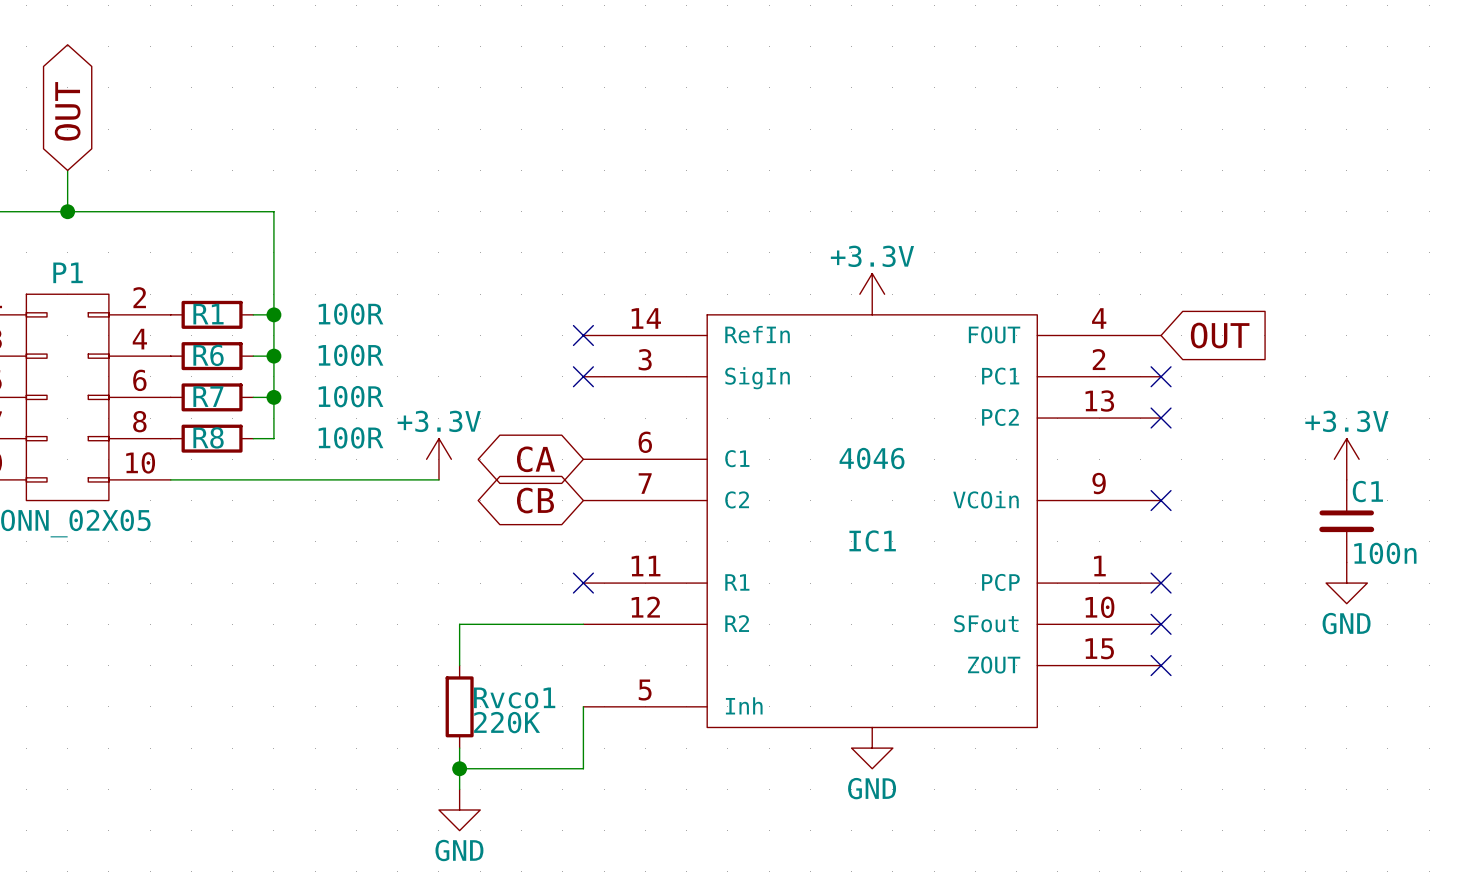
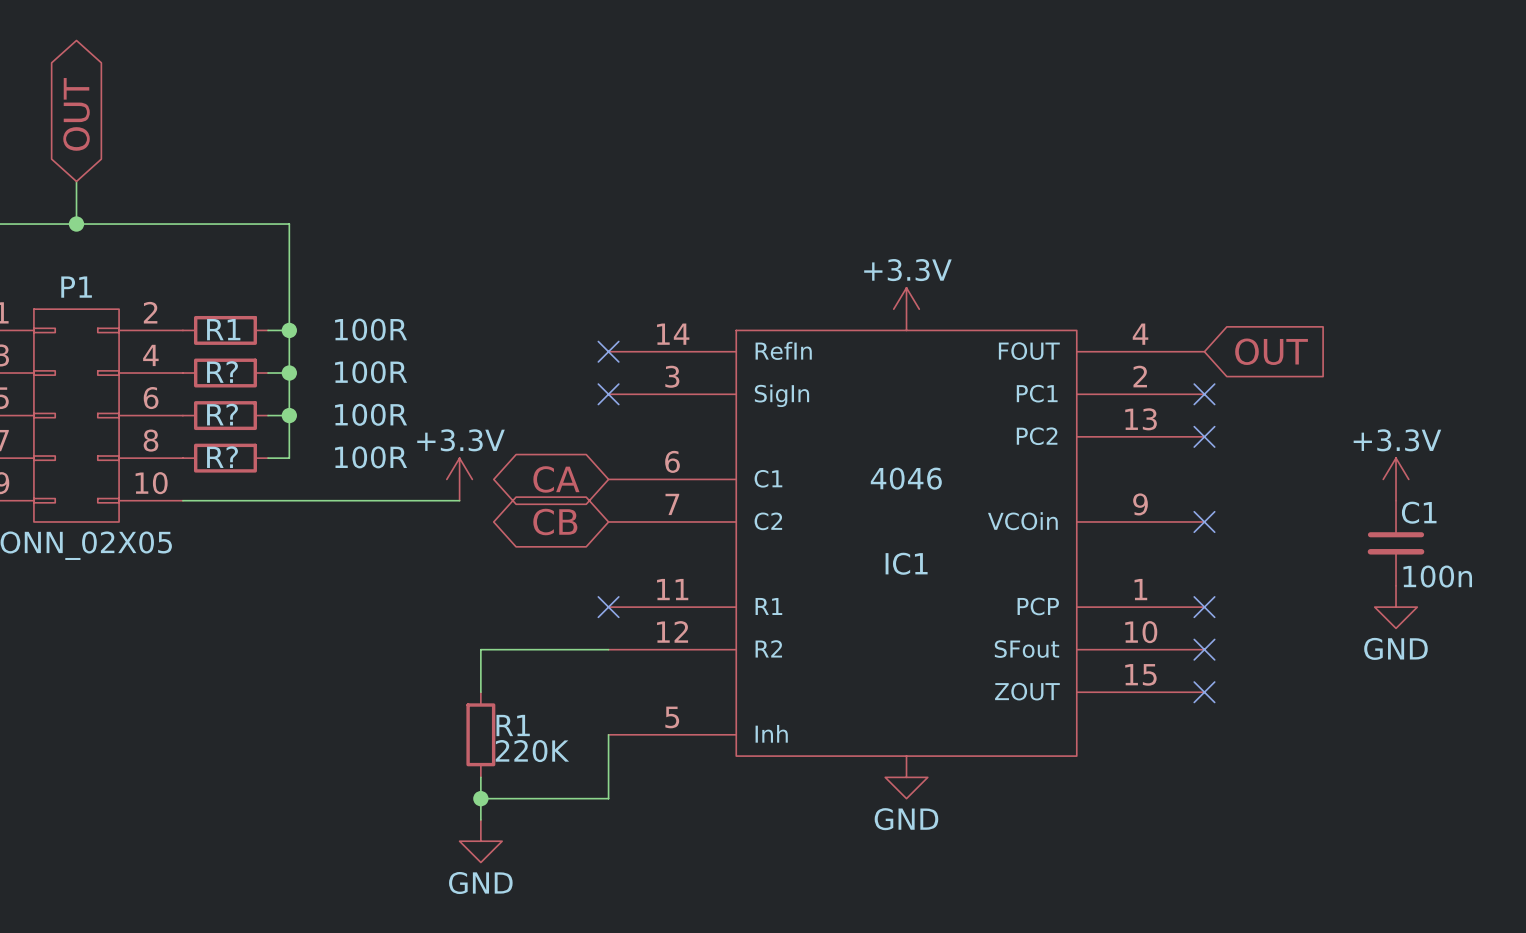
R6 name: R6 (208, 355) -> R? (222, 372)
R7 name: R7 (208, 396) -> R? (222, 414)
R8 name: R8 (208, 437) -> R? (222, 457)
Rvco1 name: Rvco1 (514, 698) -> R1 (513, 725)

